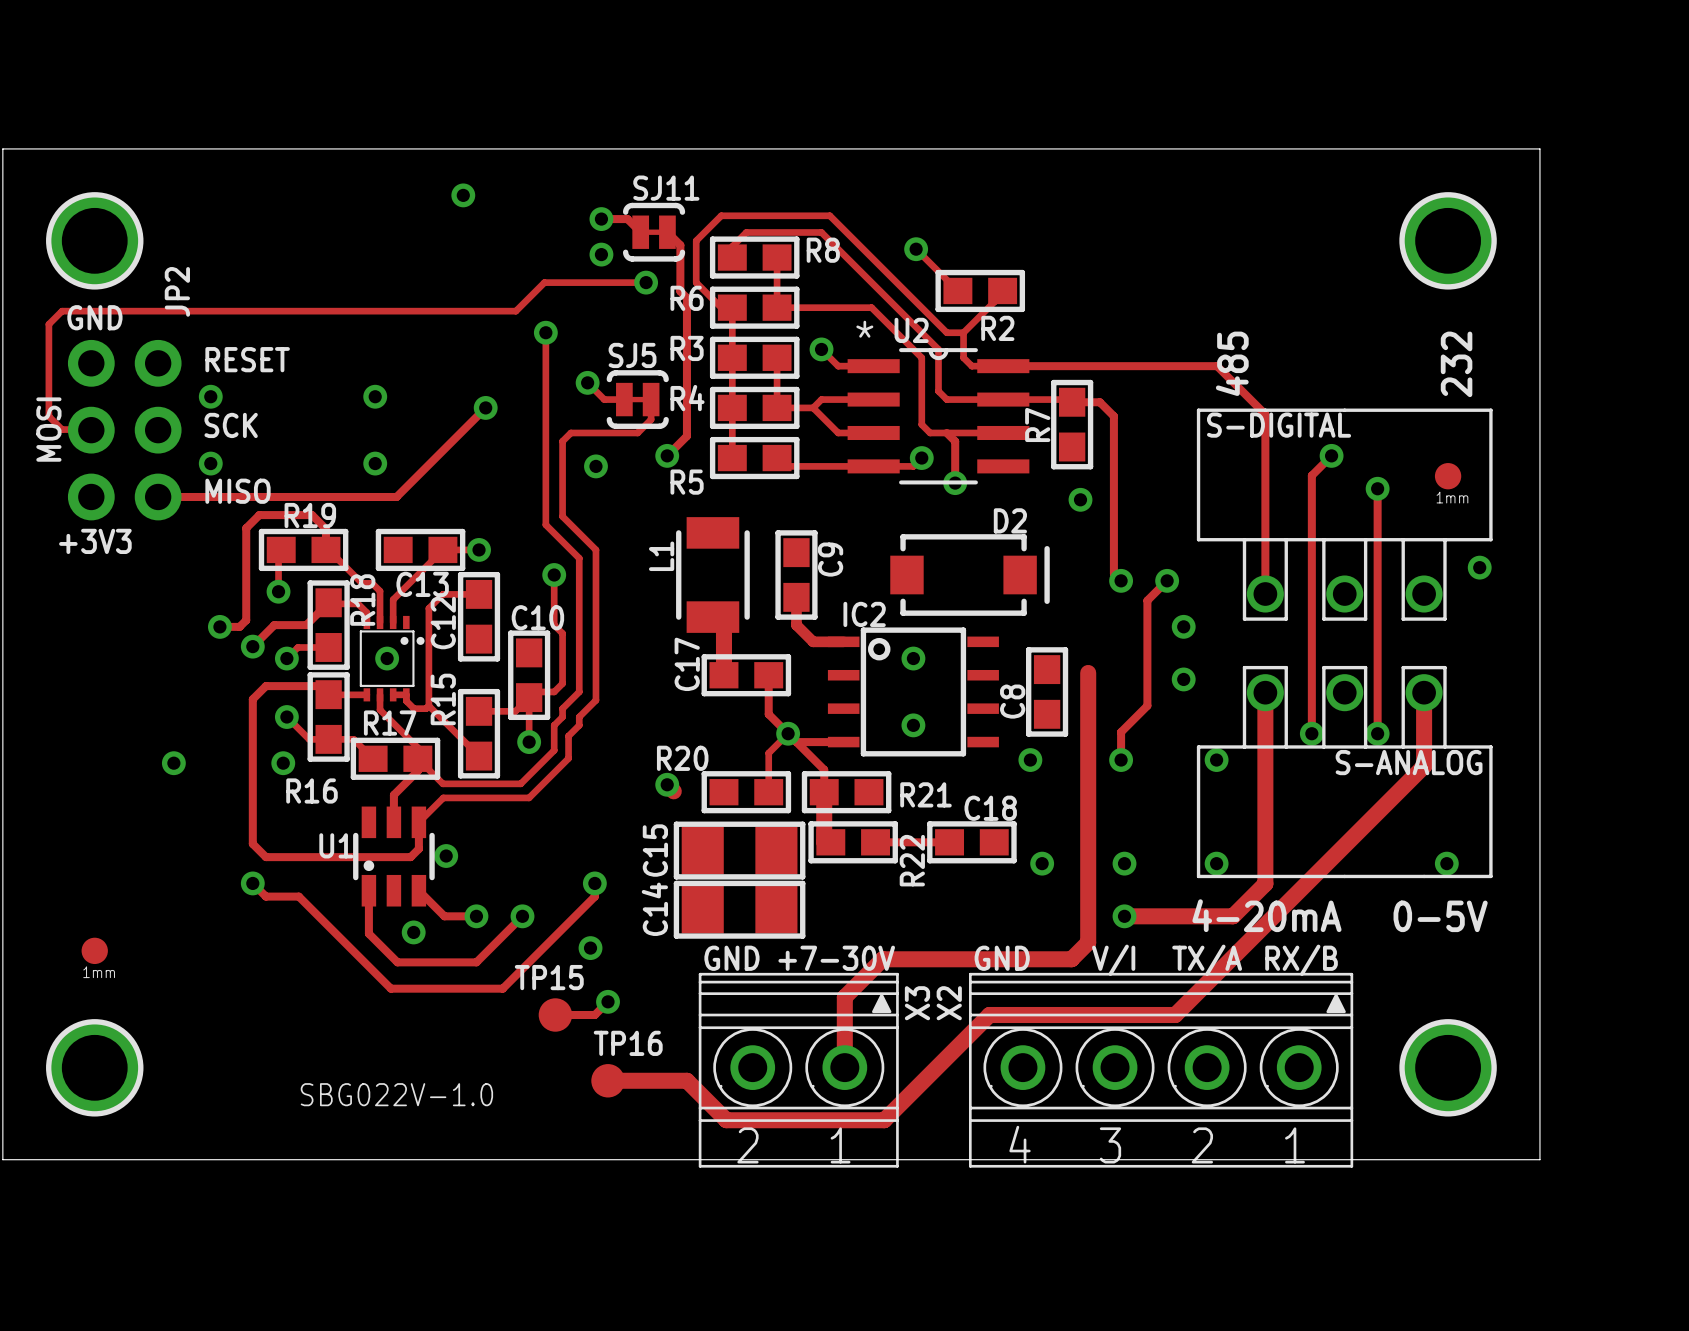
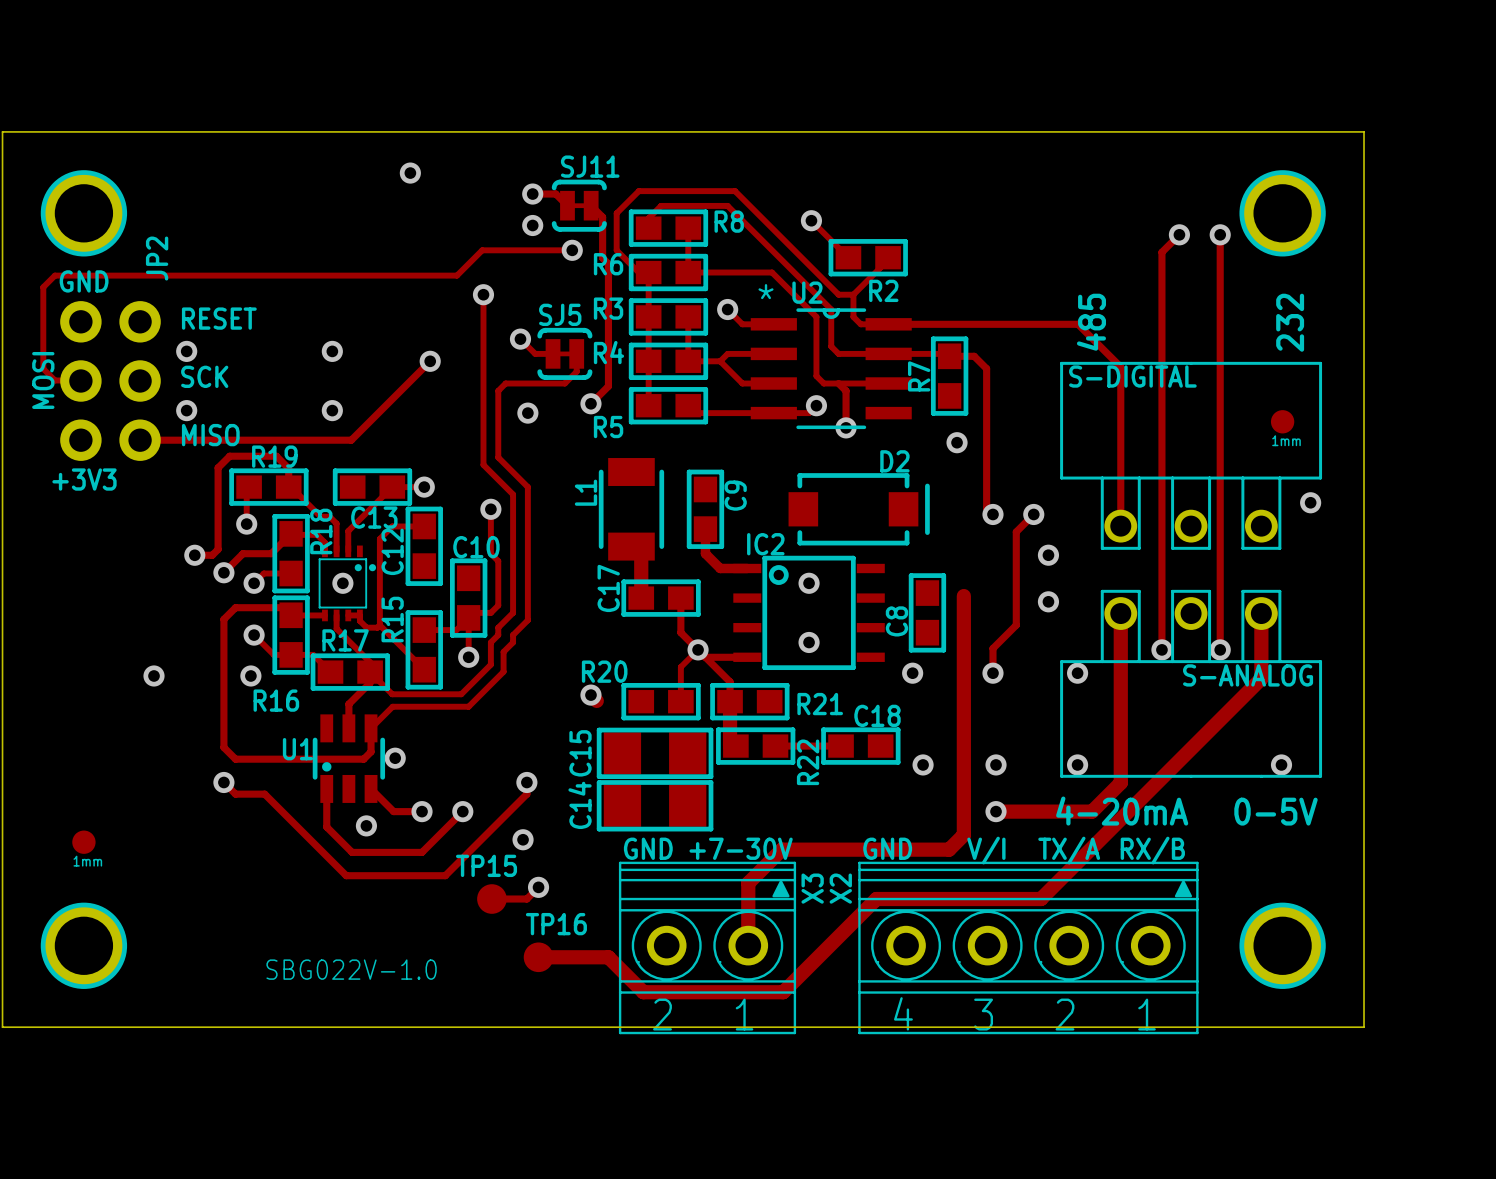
via: none -> (1179, 234)
track: none -> (1220, 234) (1220, 432)
via: none -> (1220, 234)
track: (1331, 455) (1311, 475) -> (1179, 234) (1161, 252) (1161, 421)
via: (1331, 455) -> none
via: (1377, 488) -> none

